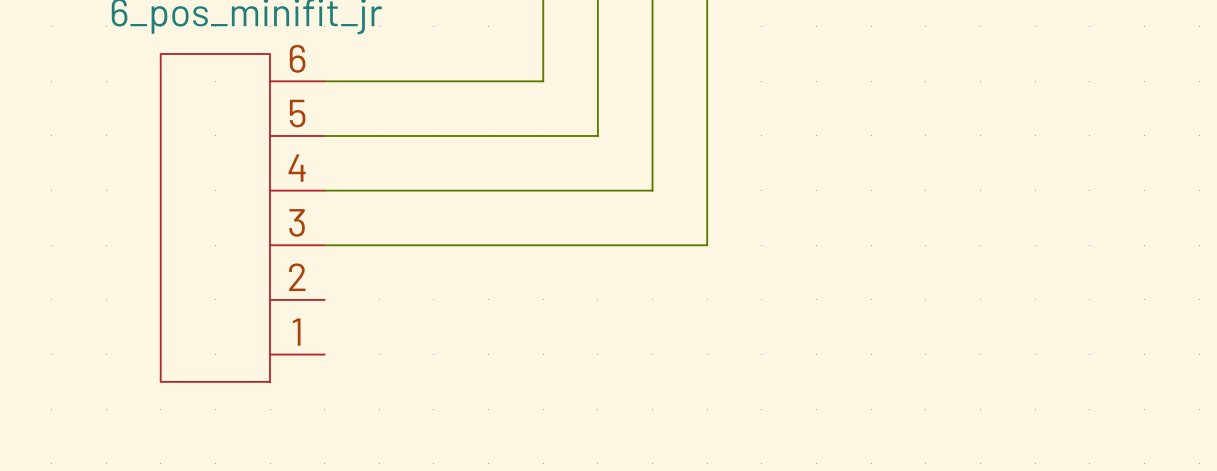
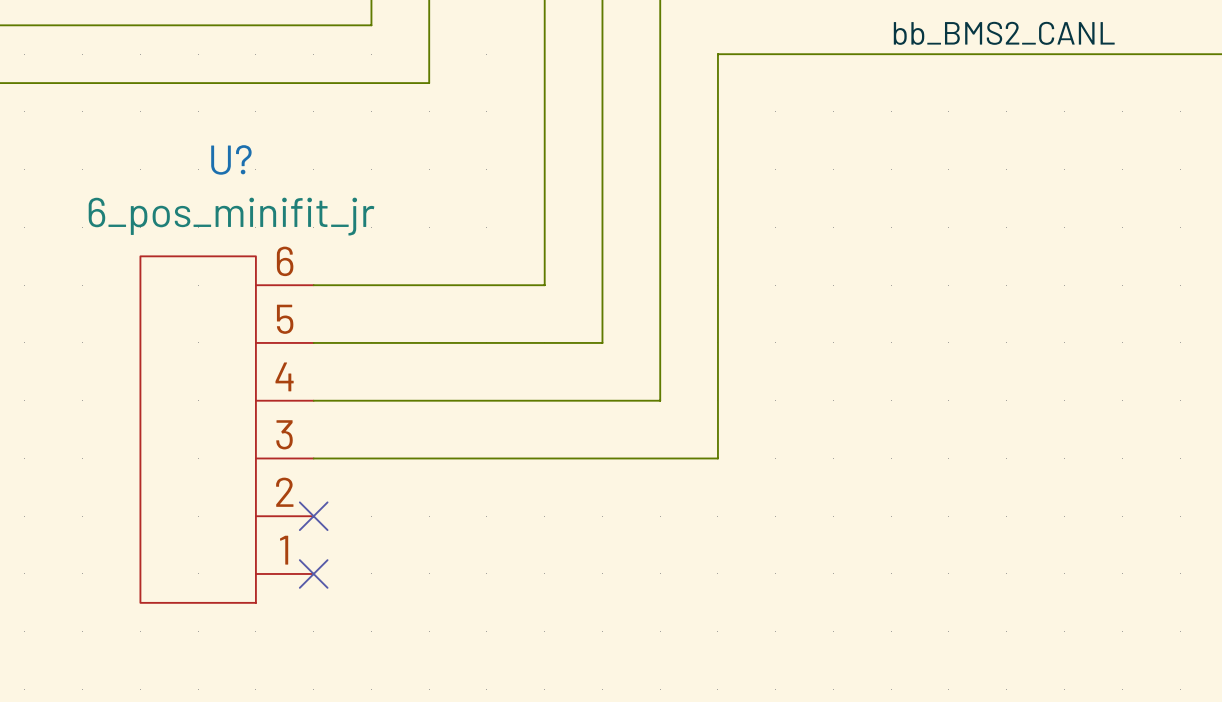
no-connect mark: none -> (313, 516)
no-connect mark: none -> (313, 573)

